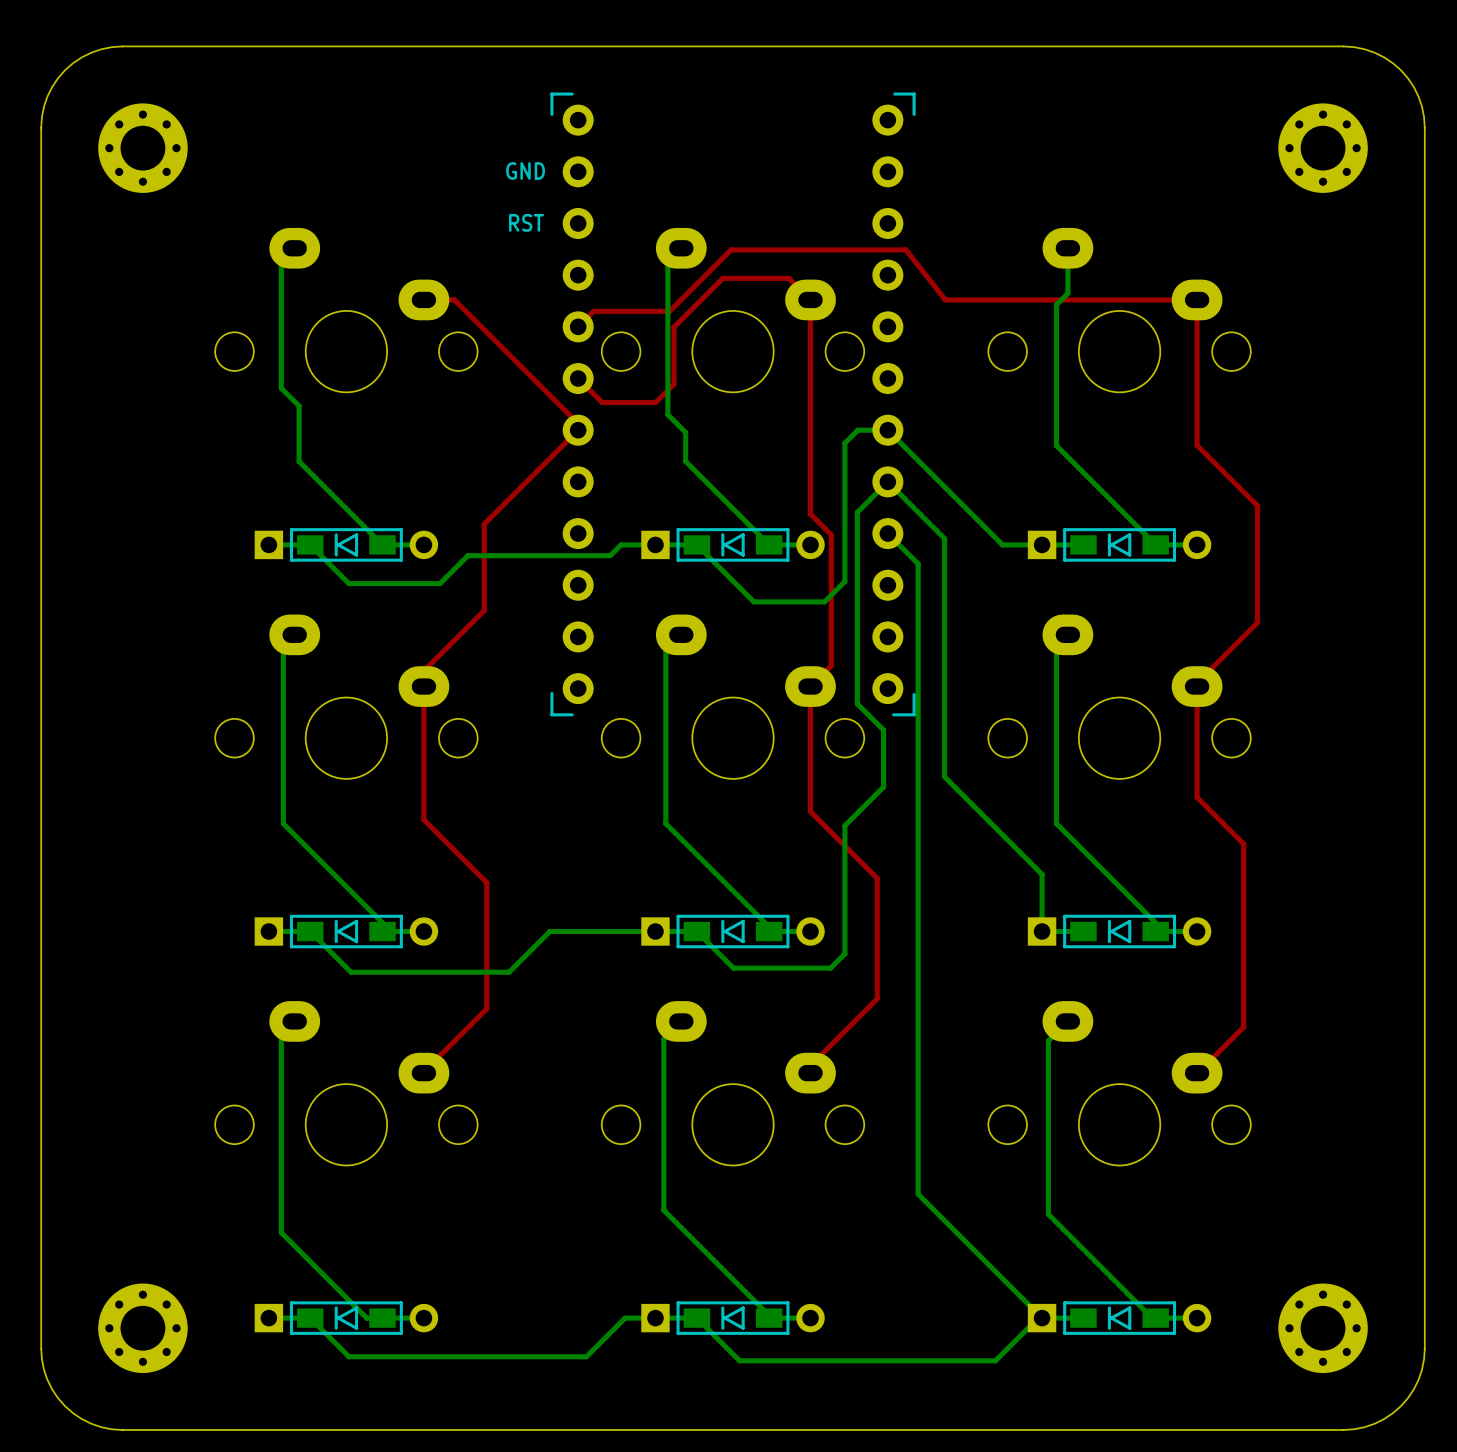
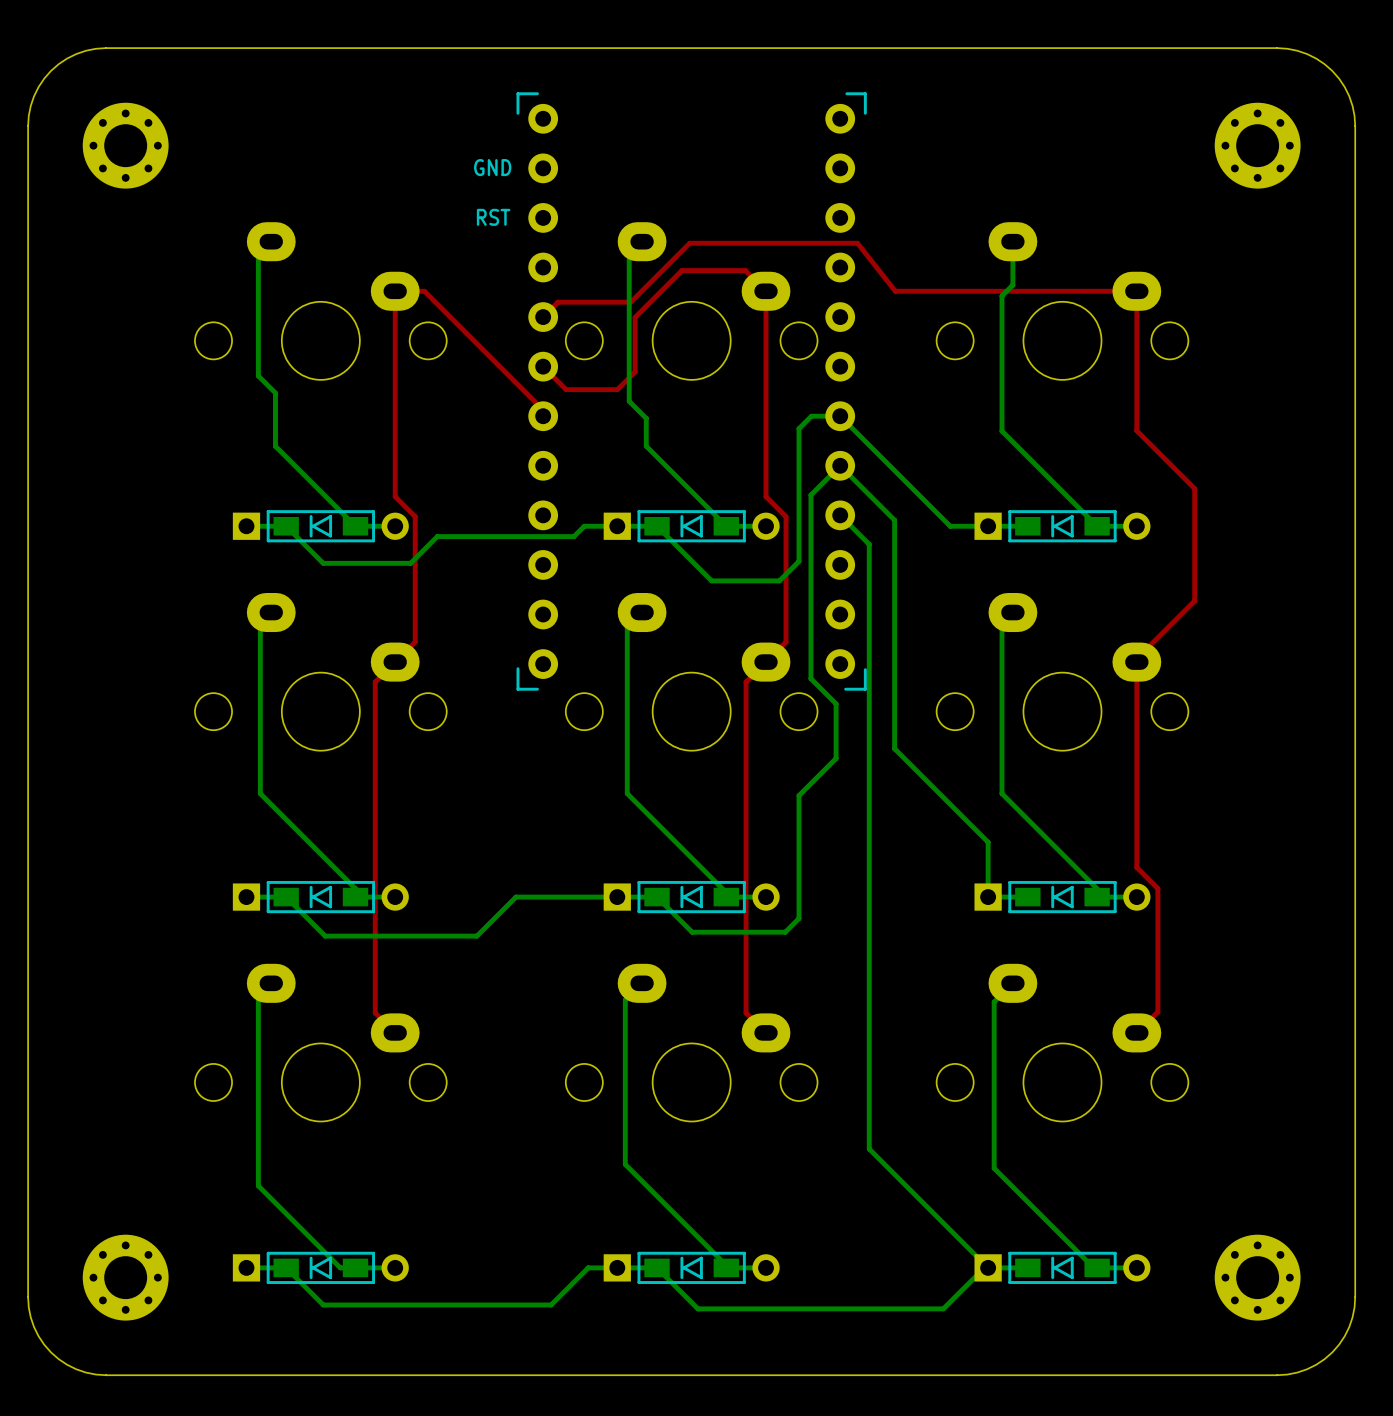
top track: (578, 430) (484, 524) (484, 610) (423, 670) (423, 819) (486, 882) (486, 1008) (423, 1073) -> (395, 291) (395, 496) (415, 516) (415, 642) (375, 682) (375, 1012) (395, 1032)
top track: (810, 686) (810, 811) (877, 878) (877, 998) (810, 1065) (810, 1073) -> (766, 662) (746, 682) (746, 1012) (766, 1032)
top track: (1197, 797) (1243, 844) (1243, 1027) (1197, 1073) -> (1136, 768) (1136, 867) (1157, 888) (1157, 1011) (1136, 1032)

